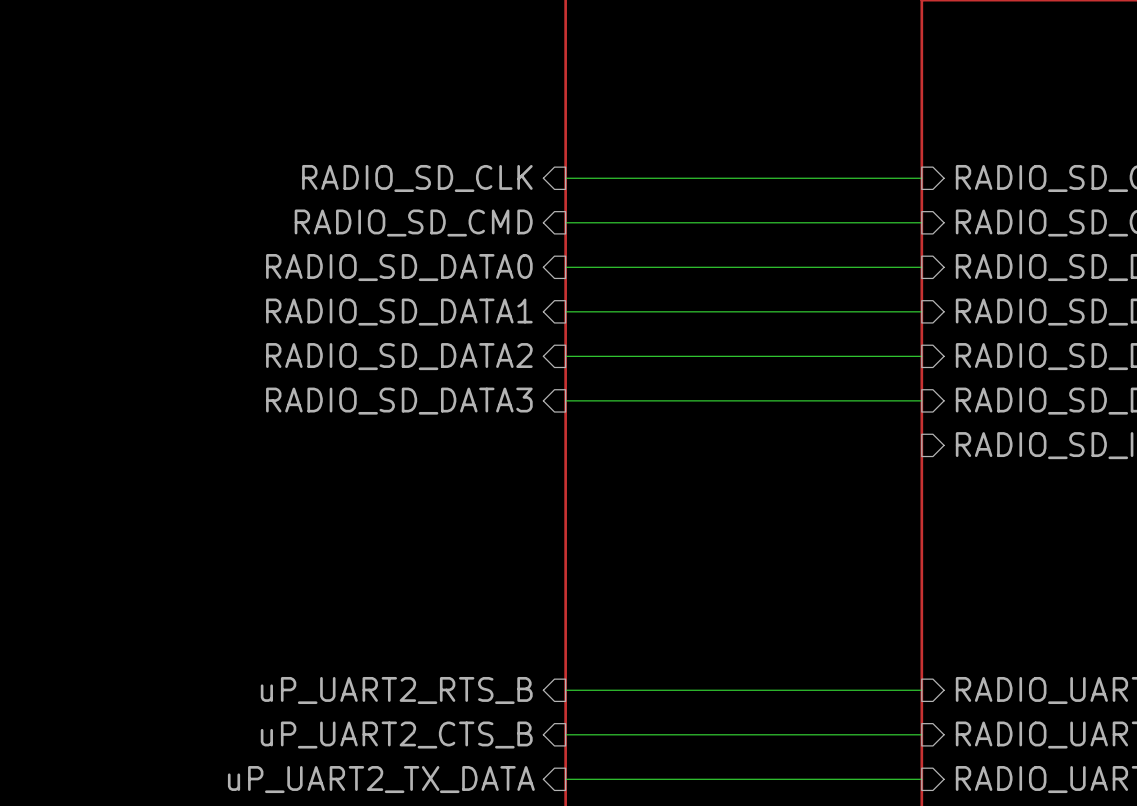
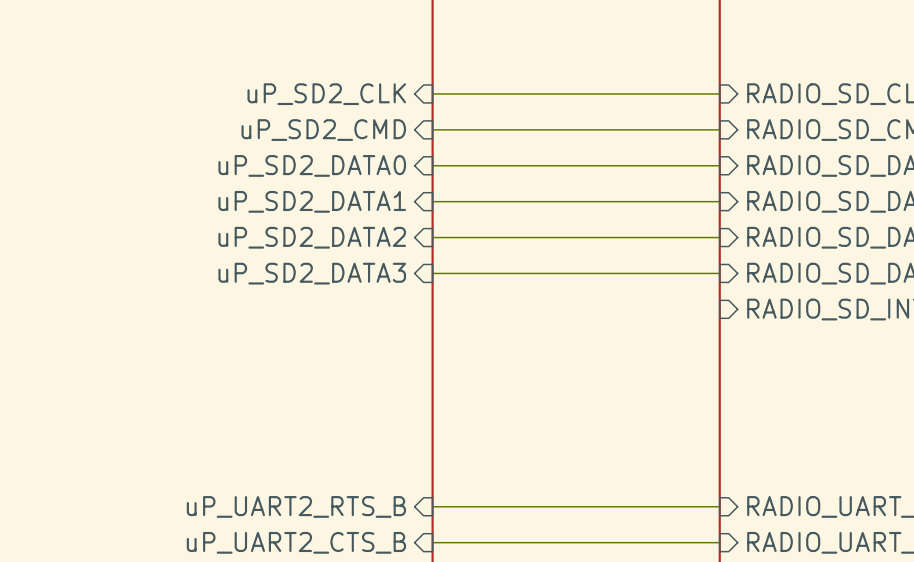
sheet pin: RADIO_SD_CLK (417, 178) -> uP_SD2_CLK (326, 94)
sheet pin: RADIO_SD_CMD (413, 223) -> uP_SD2_CMD (323, 130)
sheet pin: RADIO_SD_DATA0 (399, 267) -> uP_SD2_DATA0 (312, 165)
sheet pin: RADIO_SD_DATA1 (399, 312) -> uP_SD2_DATA1 (312, 201)
sheet pin: RADIO_SD_DATA2 (399, 356) -> uP_SD2_DATA2 (312, 237)
sheet pin: RADIO_SD_DATA3 (399, 401) -> uP_SD2_DATA3 (312, 273)

